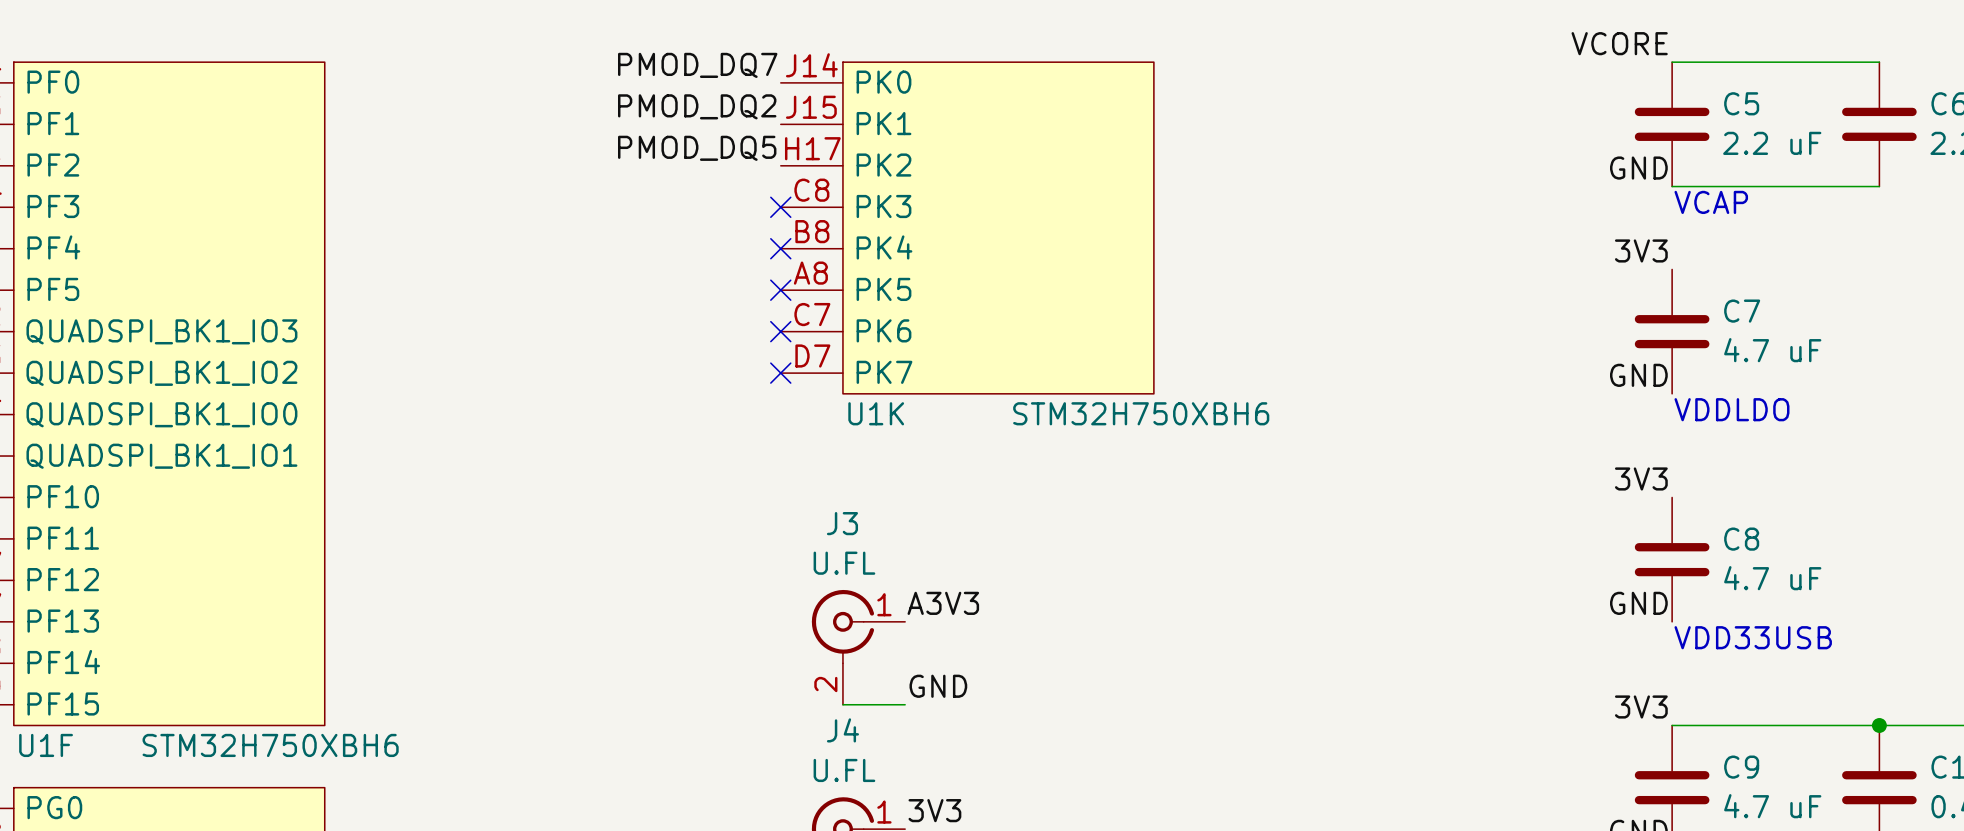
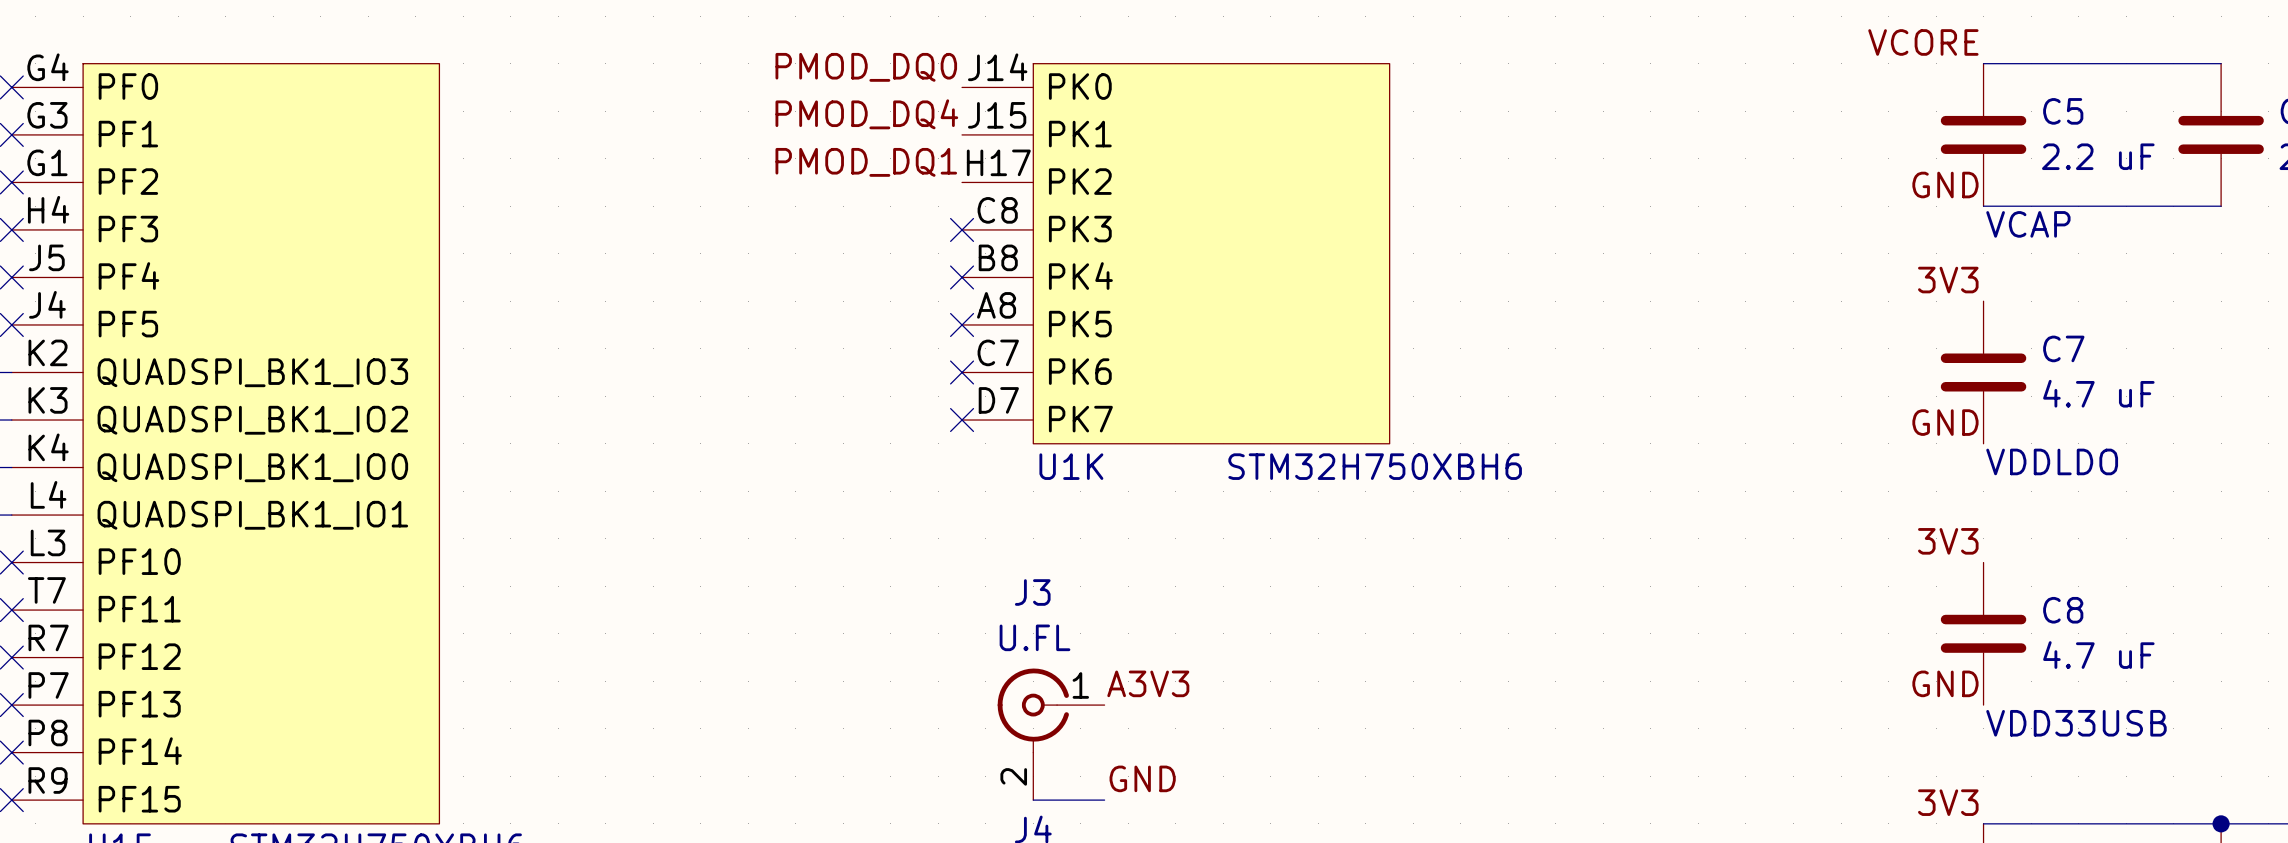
label: PMOD_DQ7 (697, 65) -> PMOD_DQ0 (866, 67)
label: PMOD_DQ2 (697, 106) -> PMOD_DQ4 (866, 114)
label: PMOD_DQ5 (697, 148) -> PMOD_DQ1 (866, 162)

